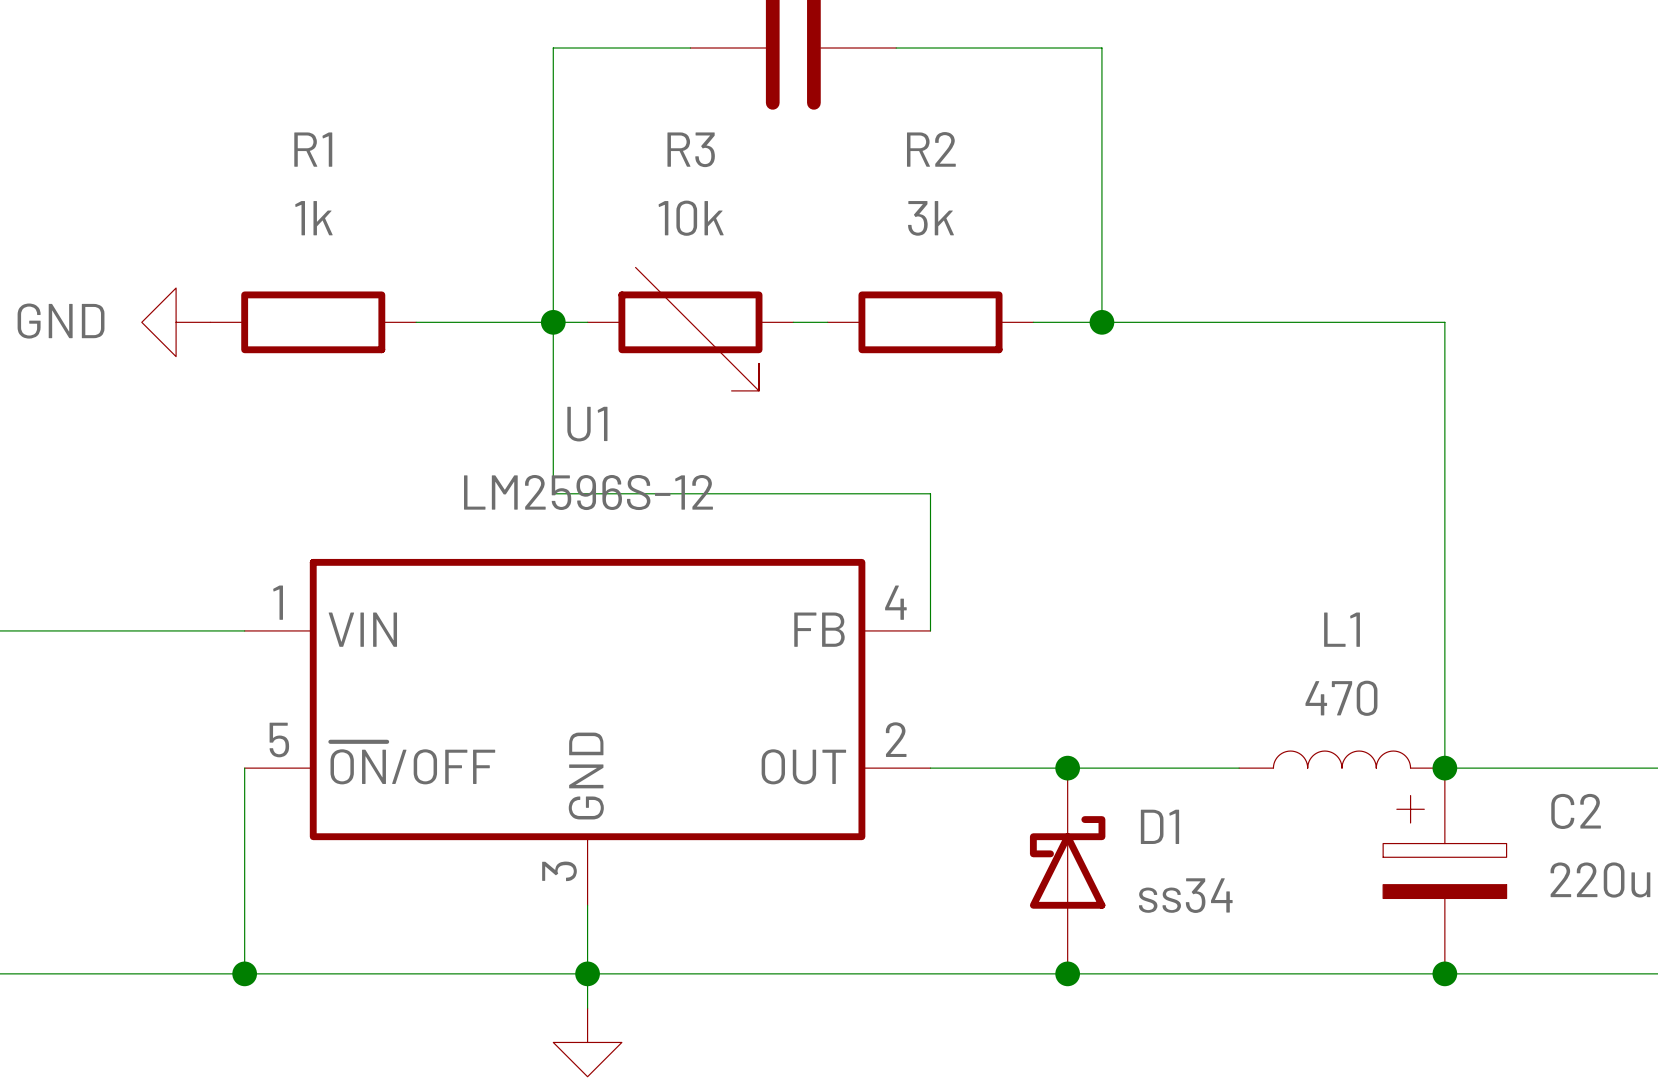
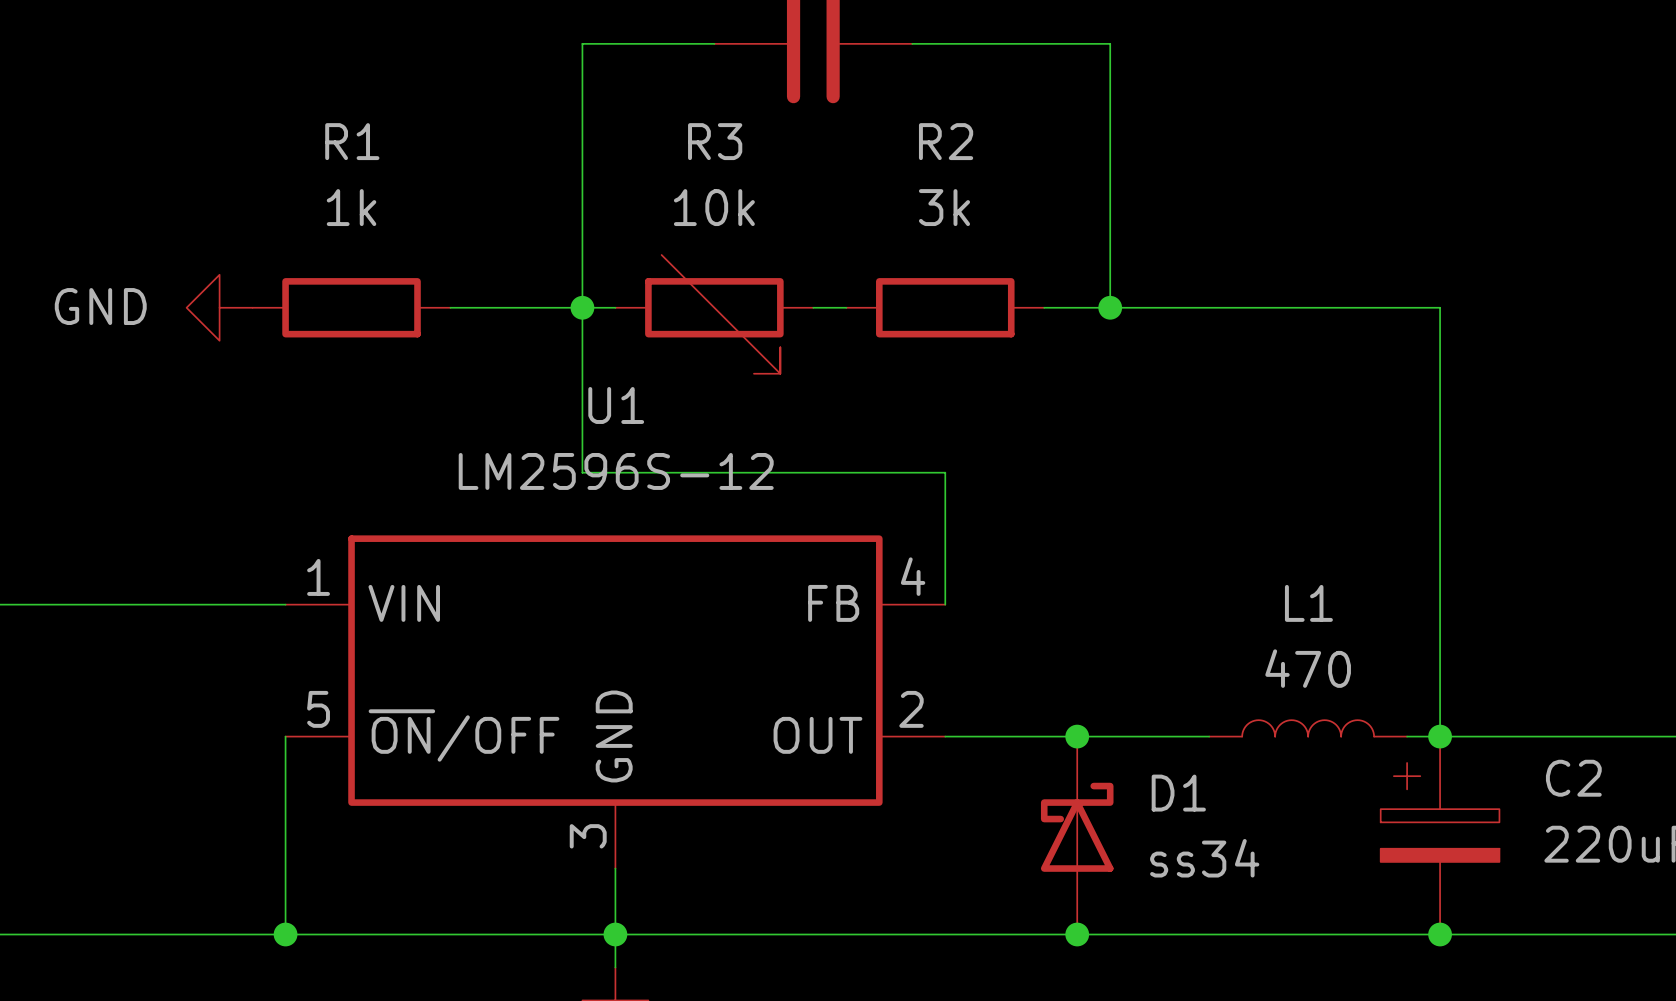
L1 position: (1341, 759) -> (1308, 728)

